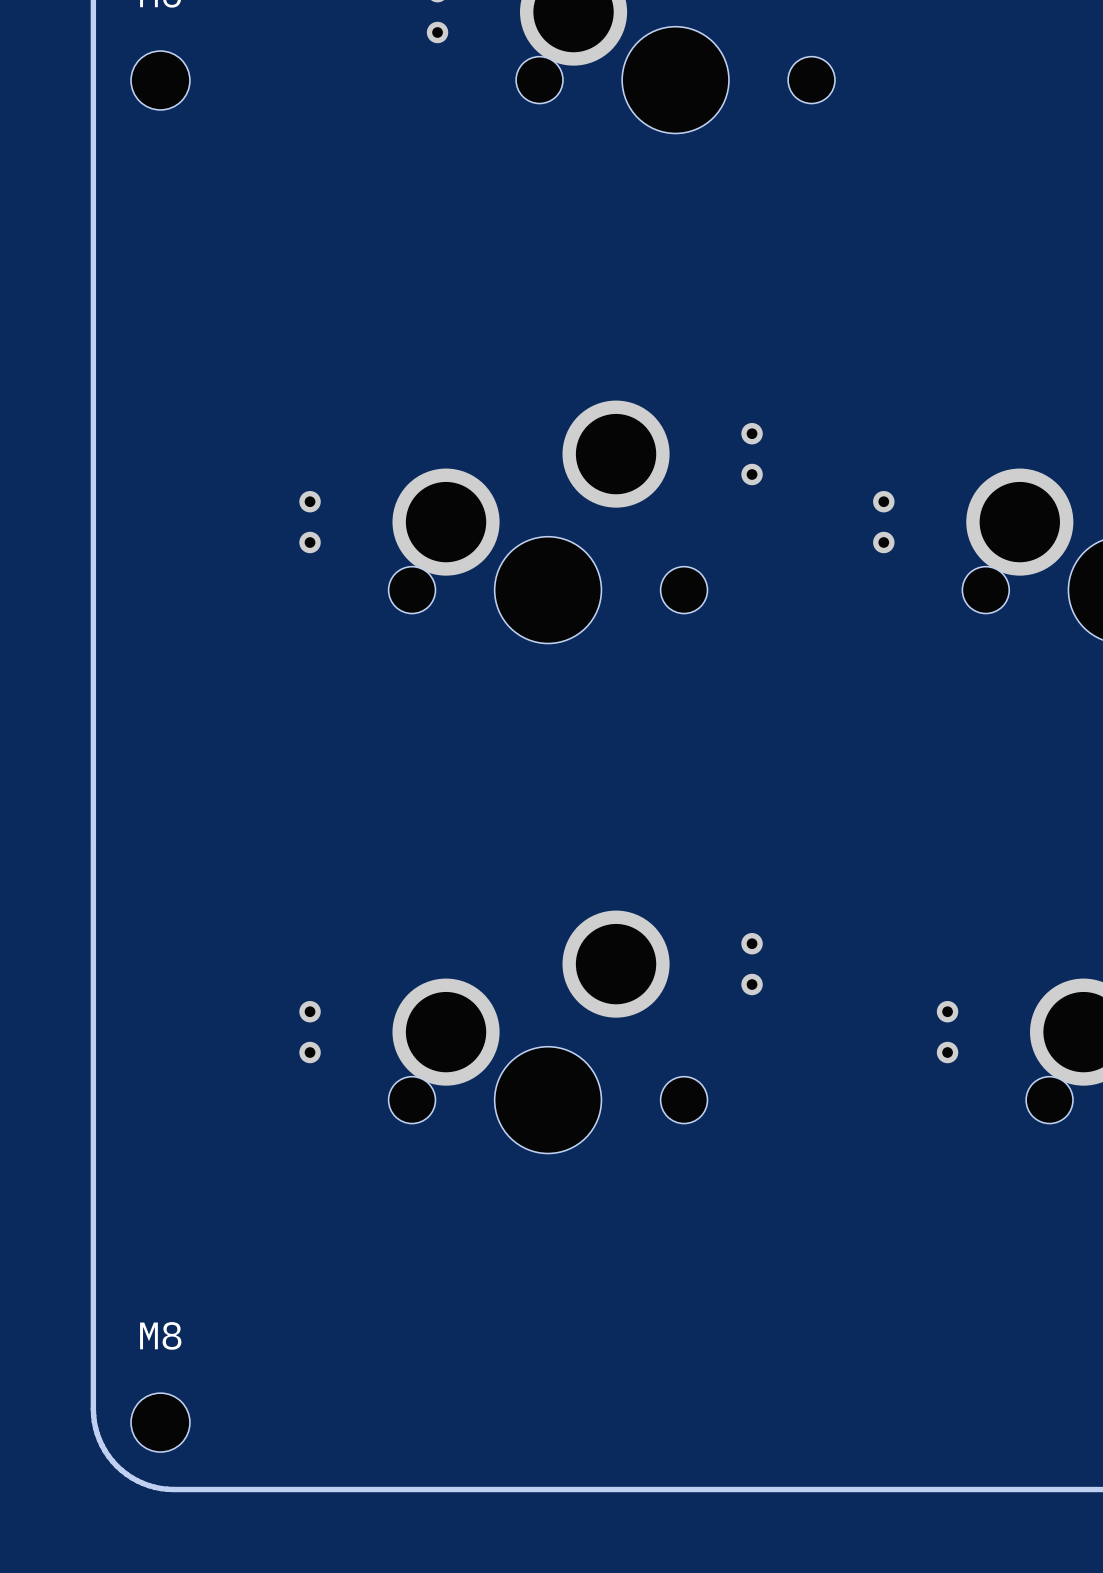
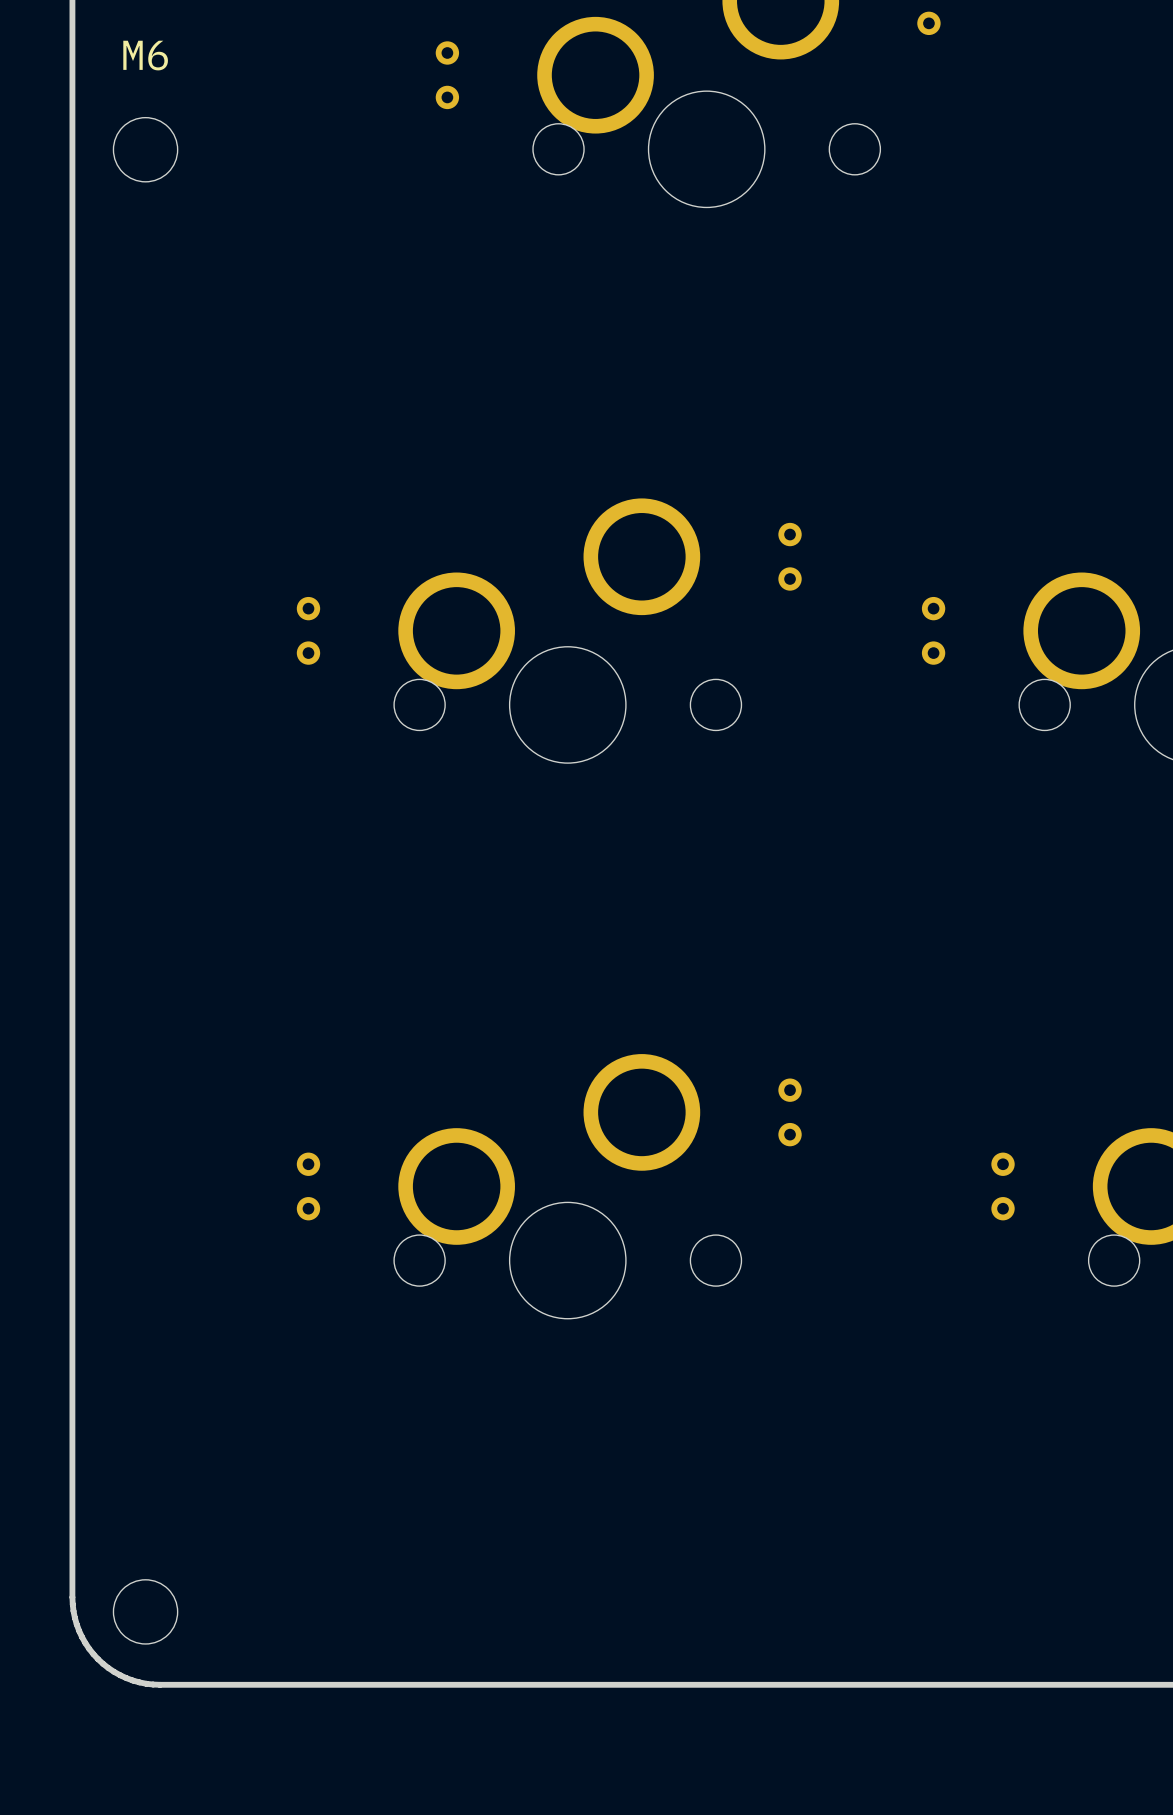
M8 name: M8 (160, 1335) -> none

